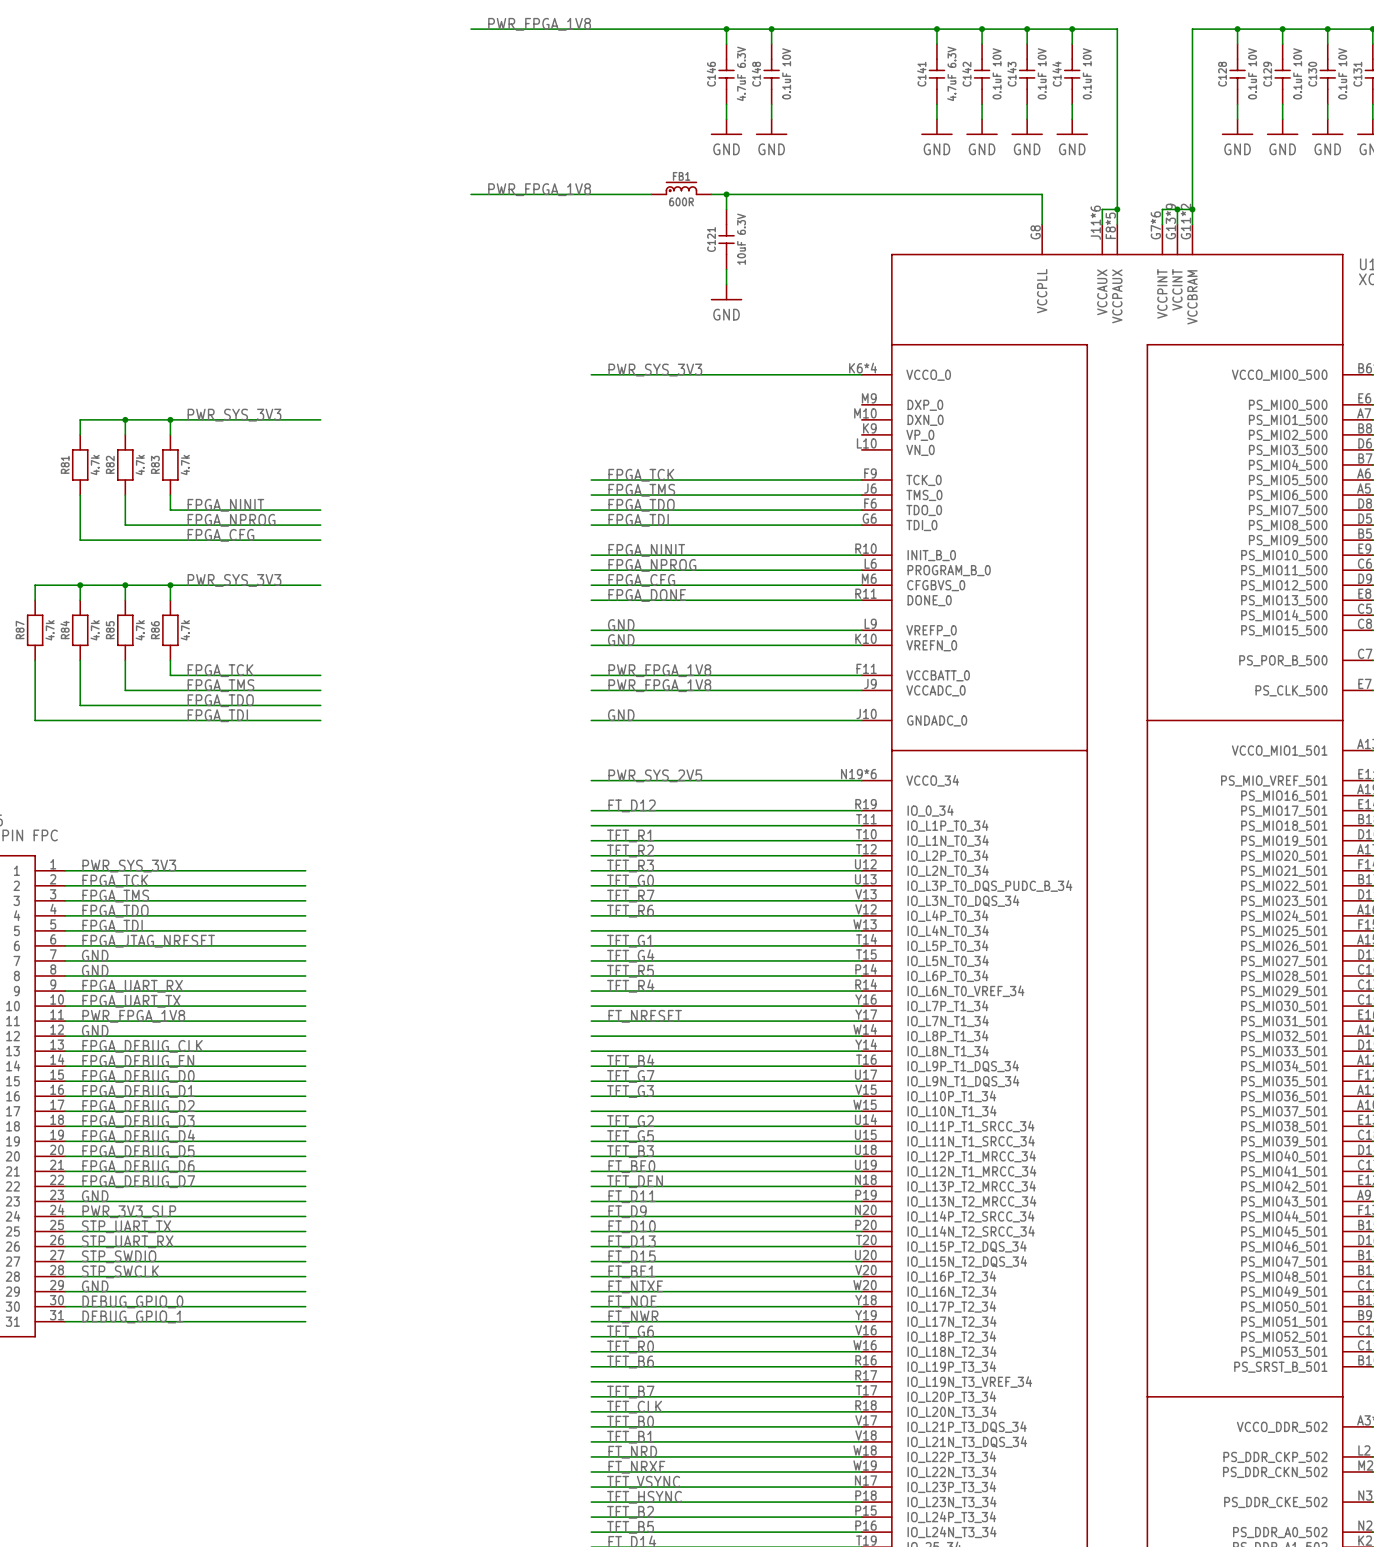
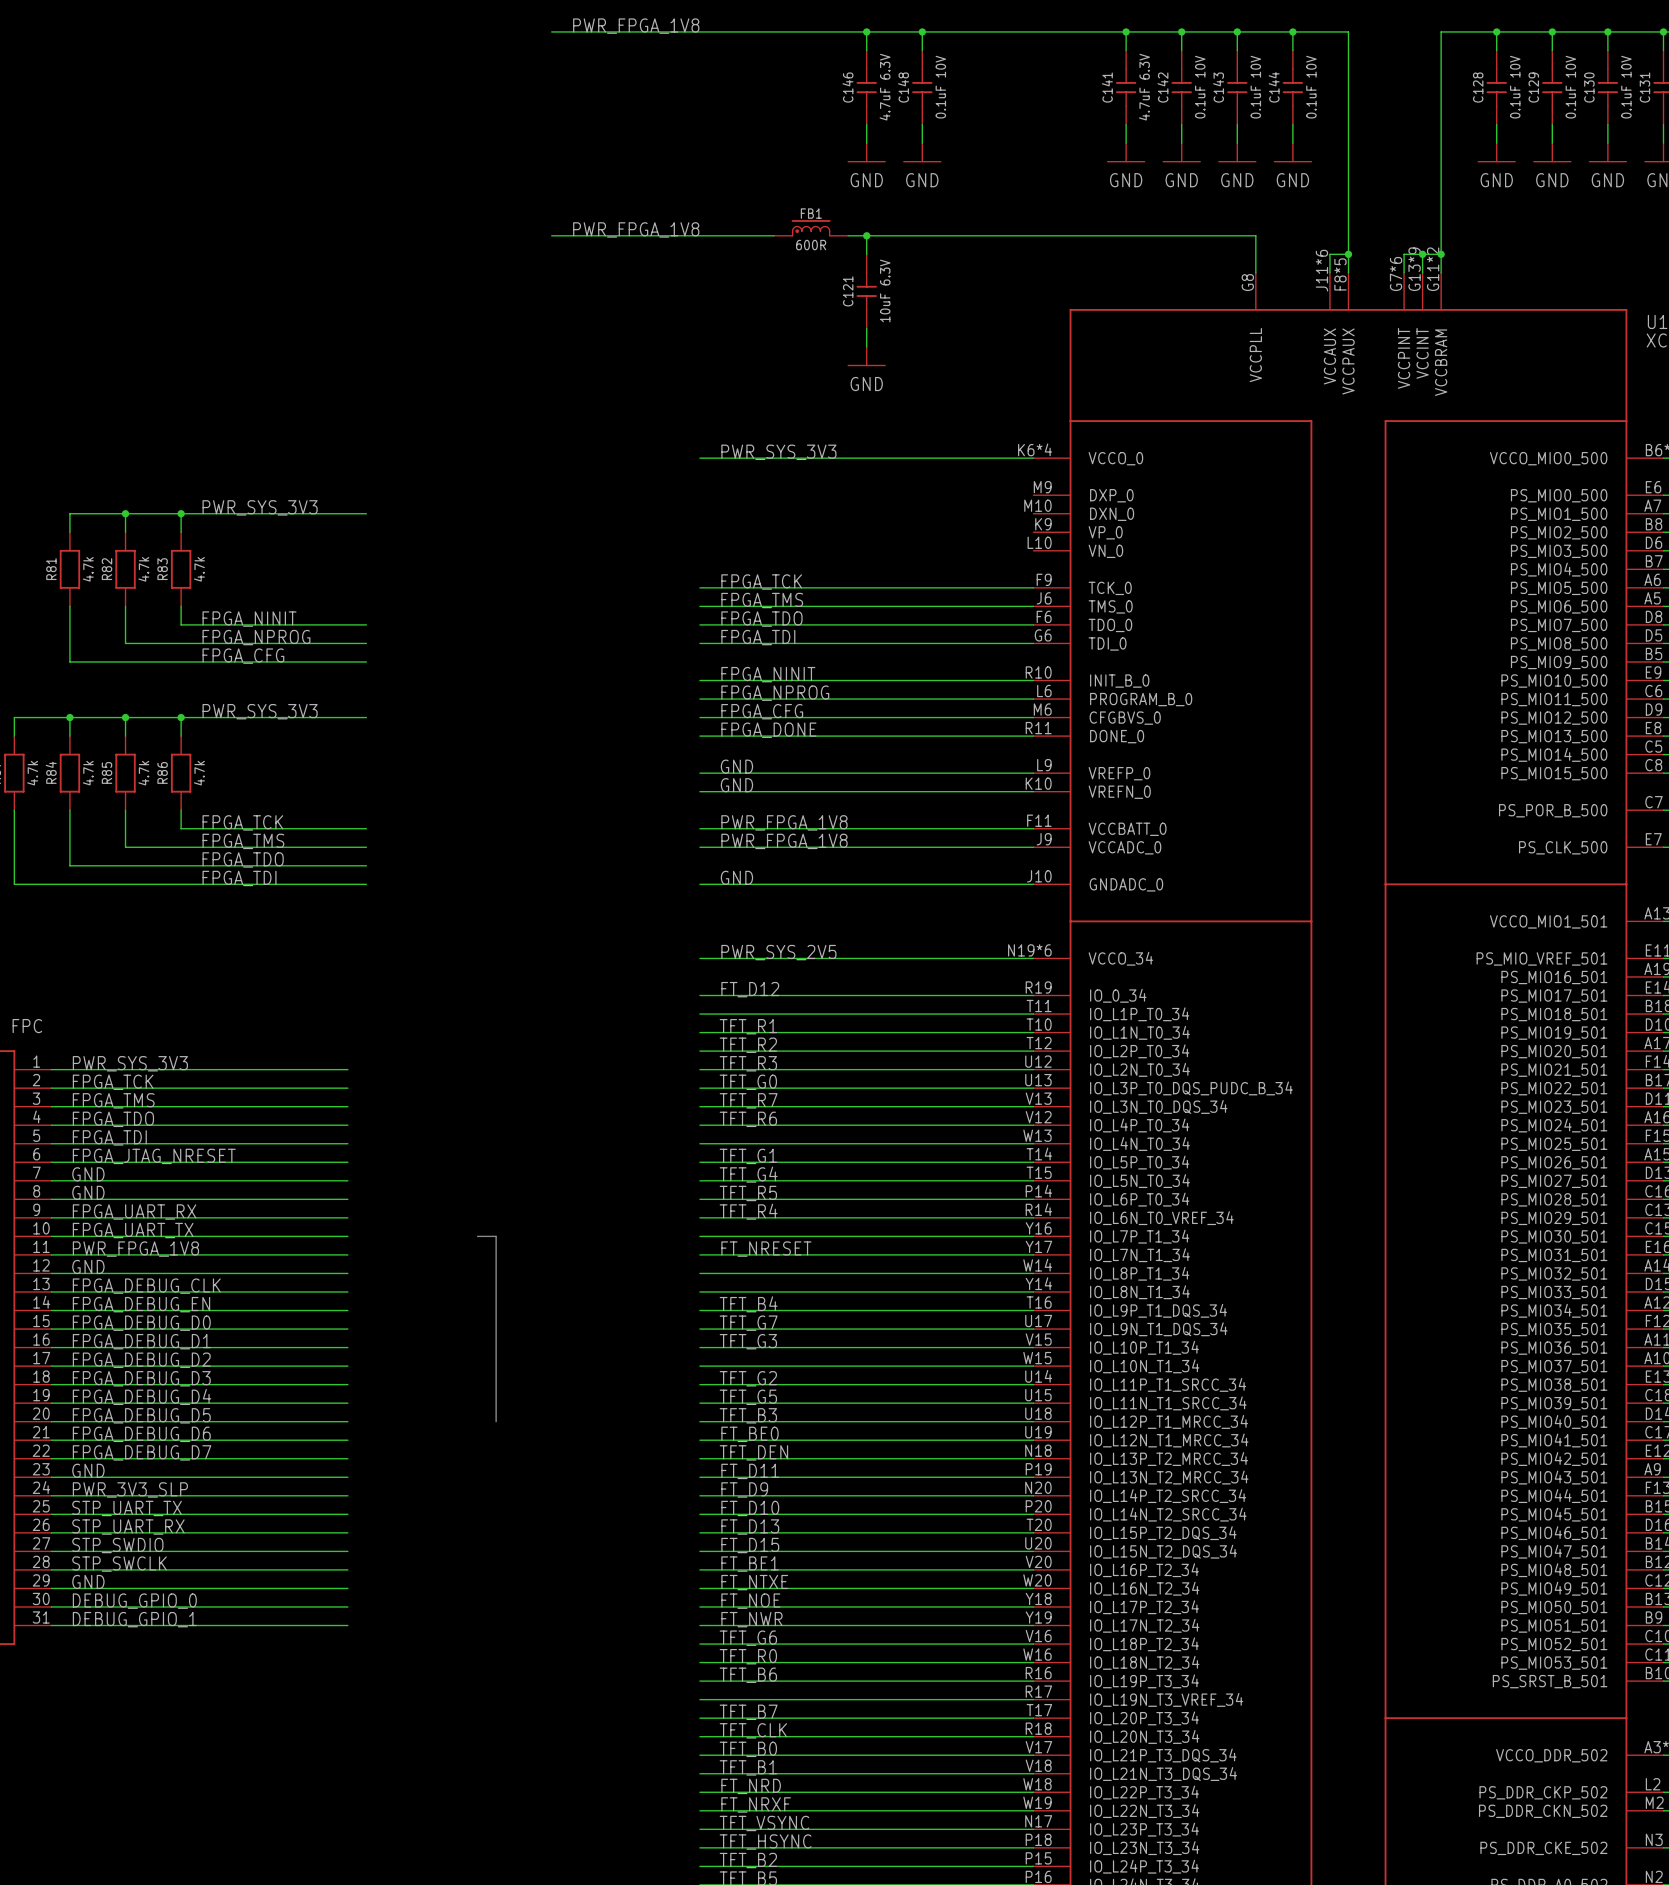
bus: none -> (477, 1236) (496, 1236) (496, 1421)

